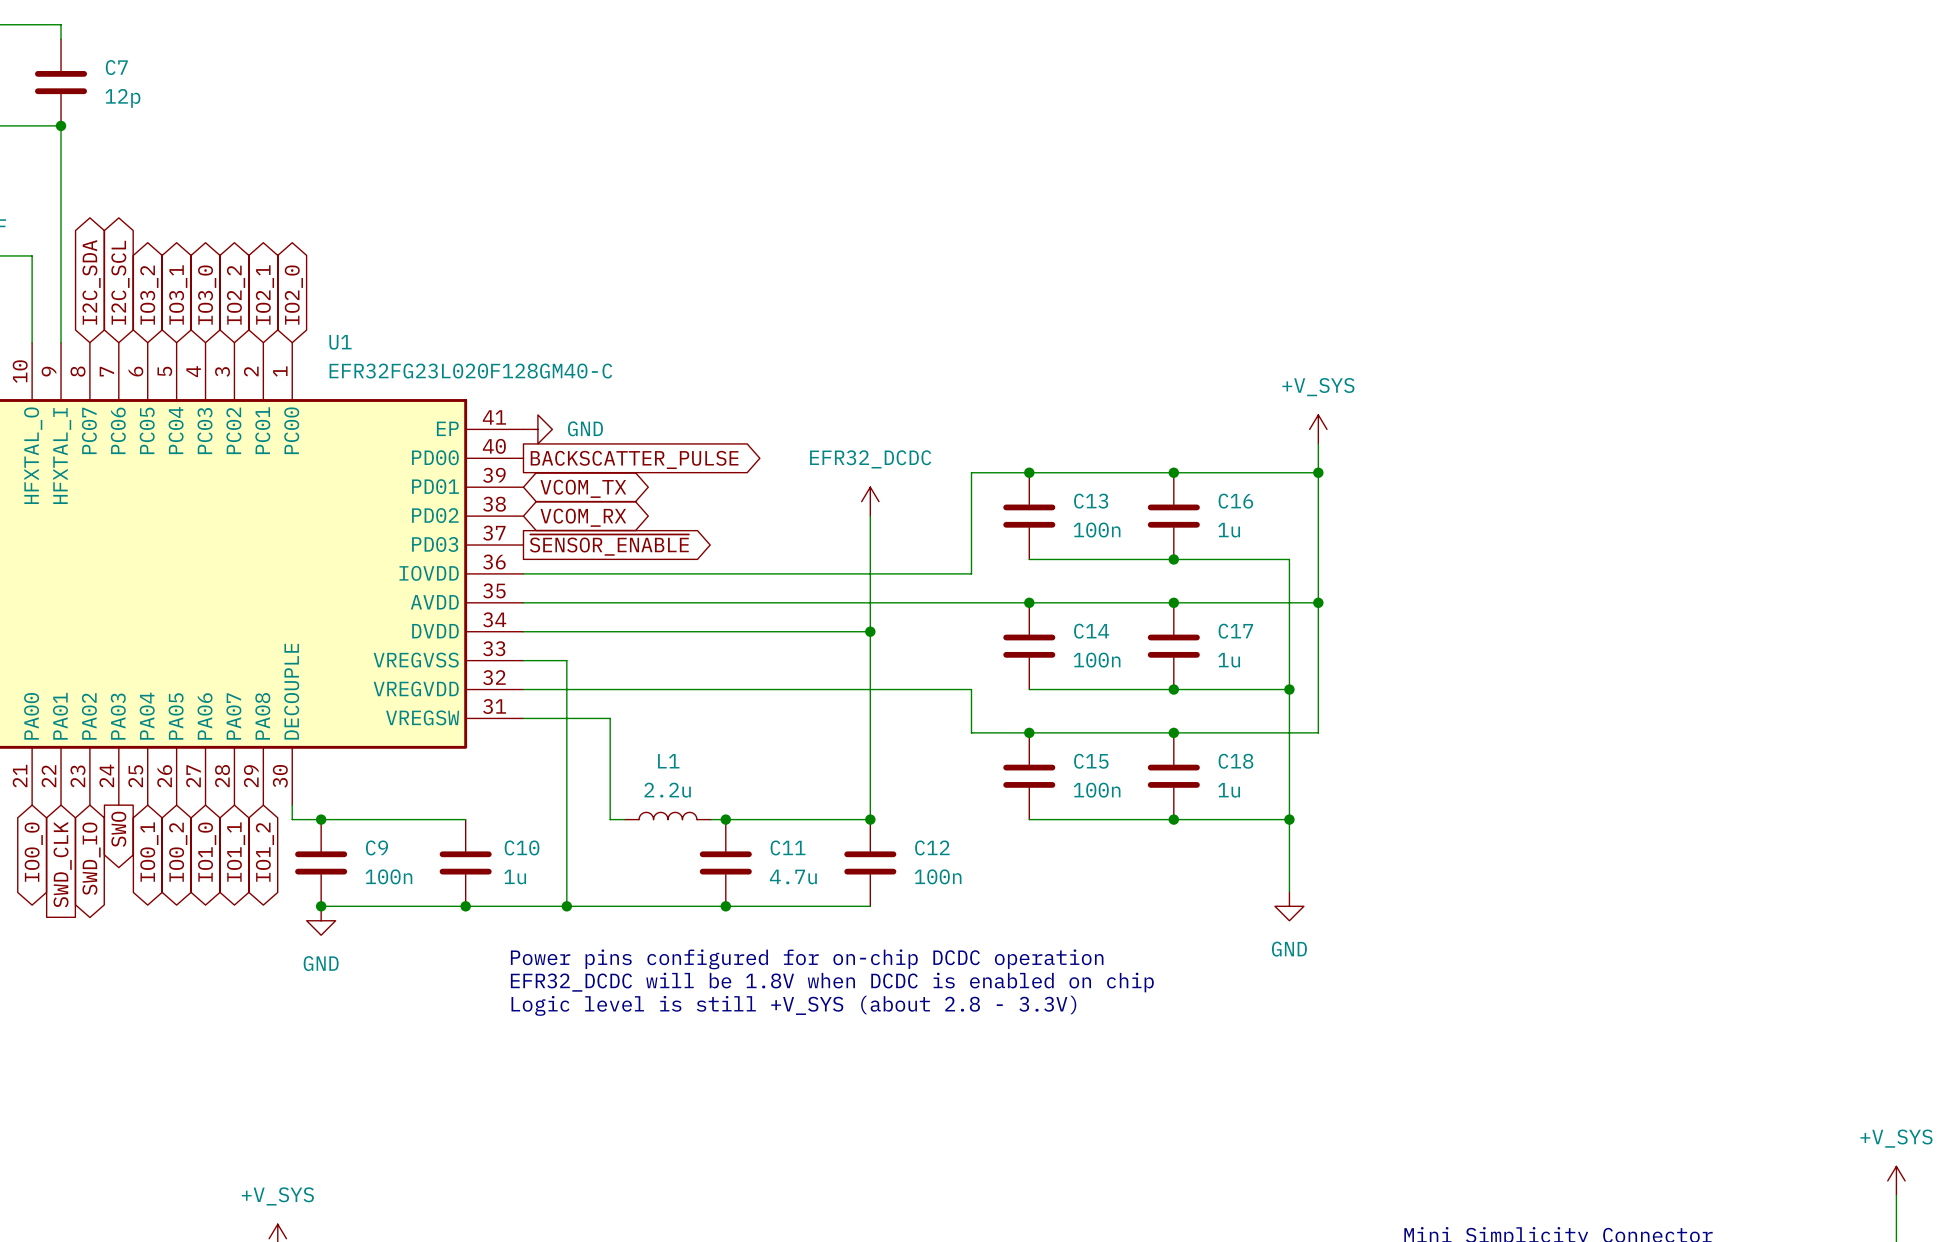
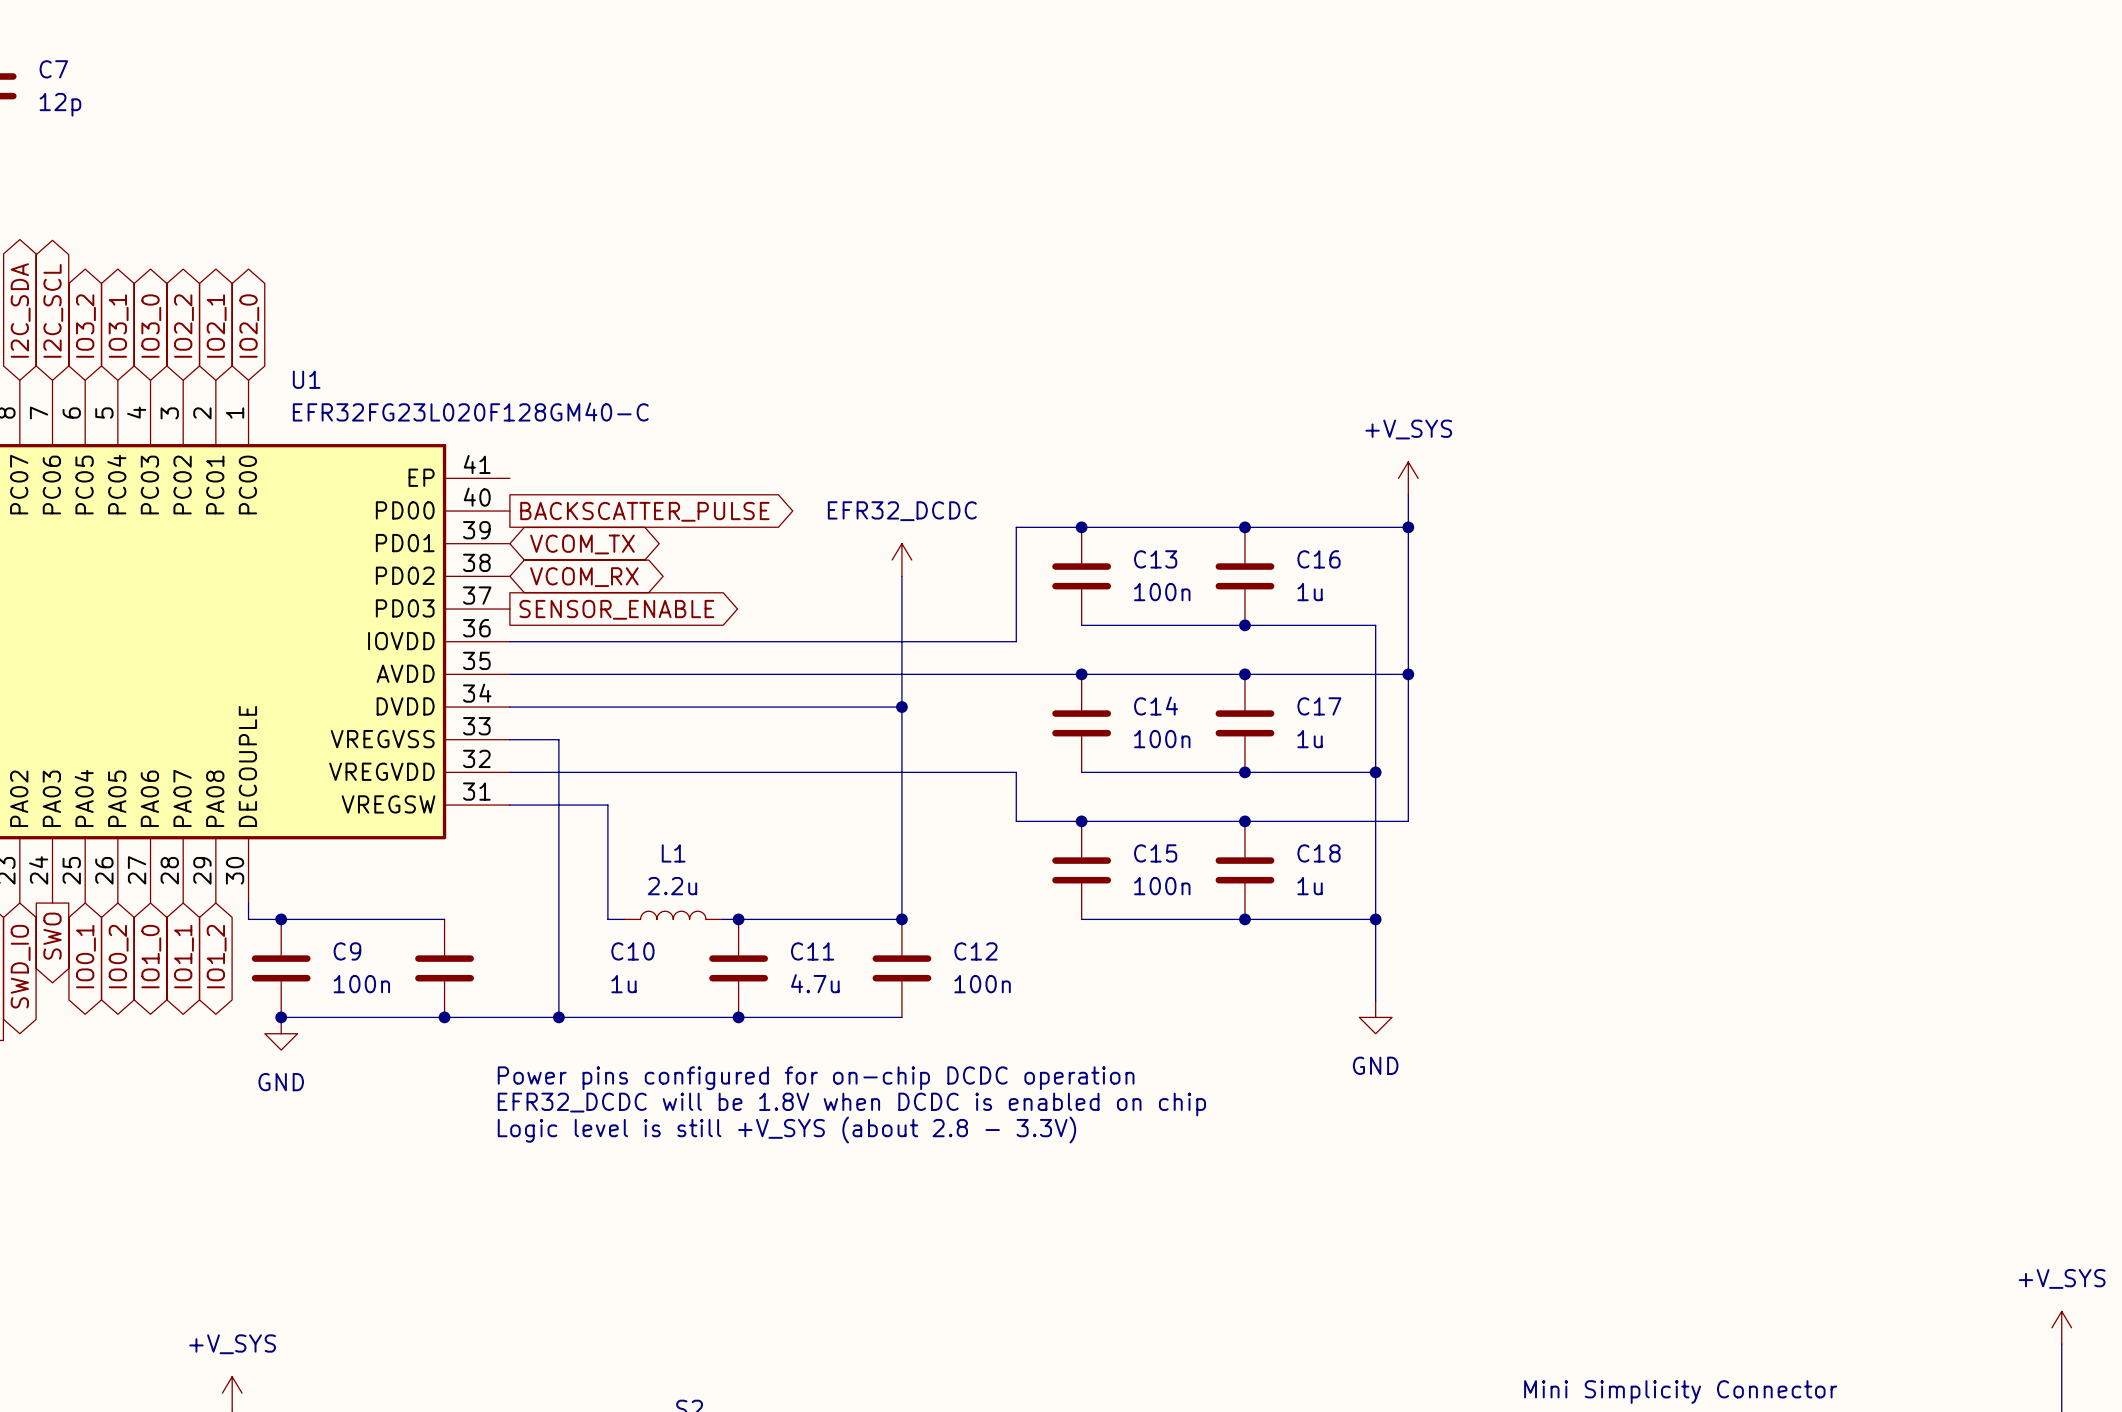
power symbol: GND (537, 429) -> none
global label: ~{SENSOR_ENABLE} (609, 545) -> SENSOR_ENABLE (616, 609)
C10 name position: C10 (522, 847) -> C10 (632, 951)
C10 value position: 1u (515, 876) -> 1u (623, 984)

